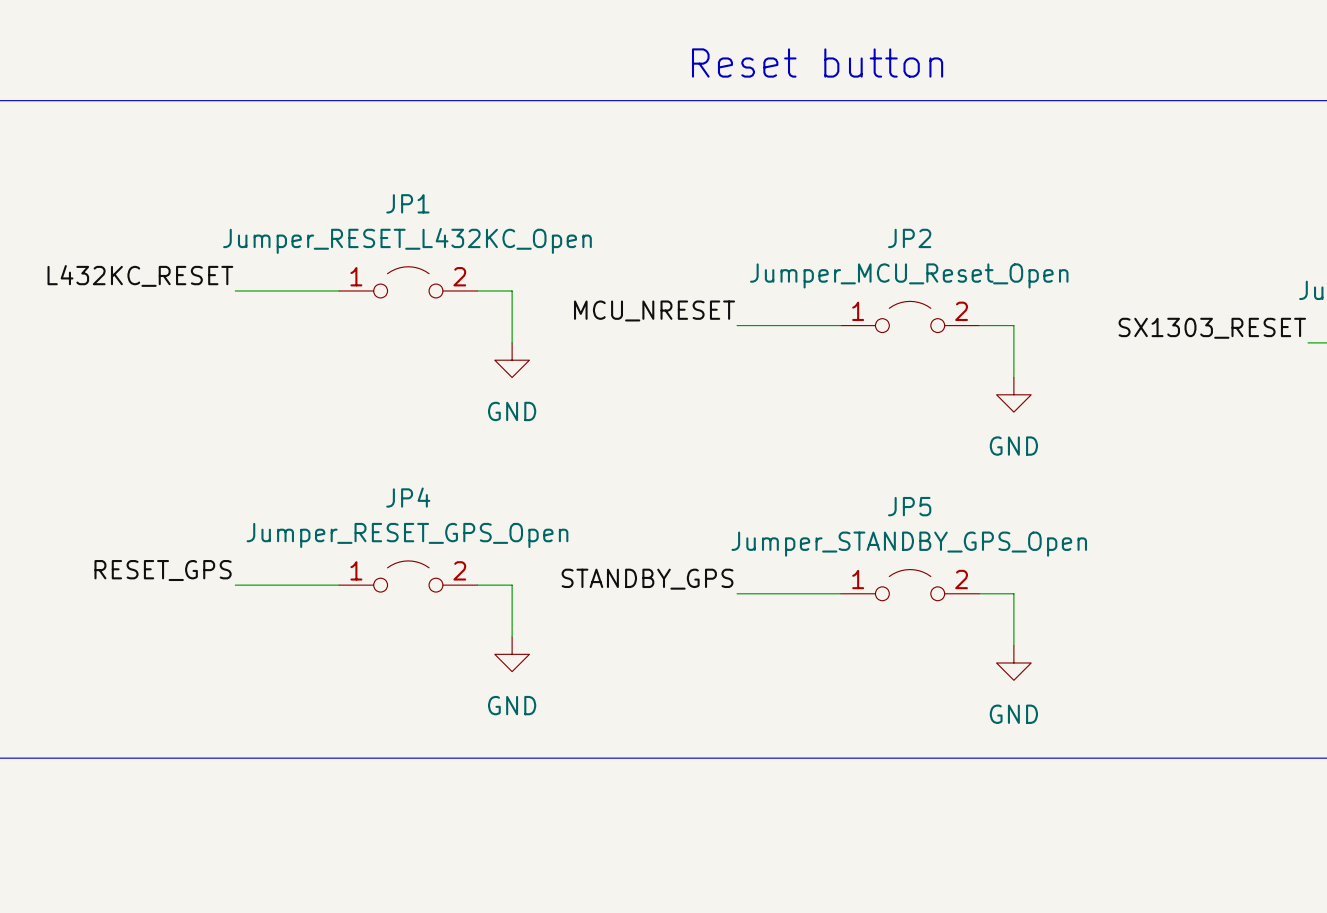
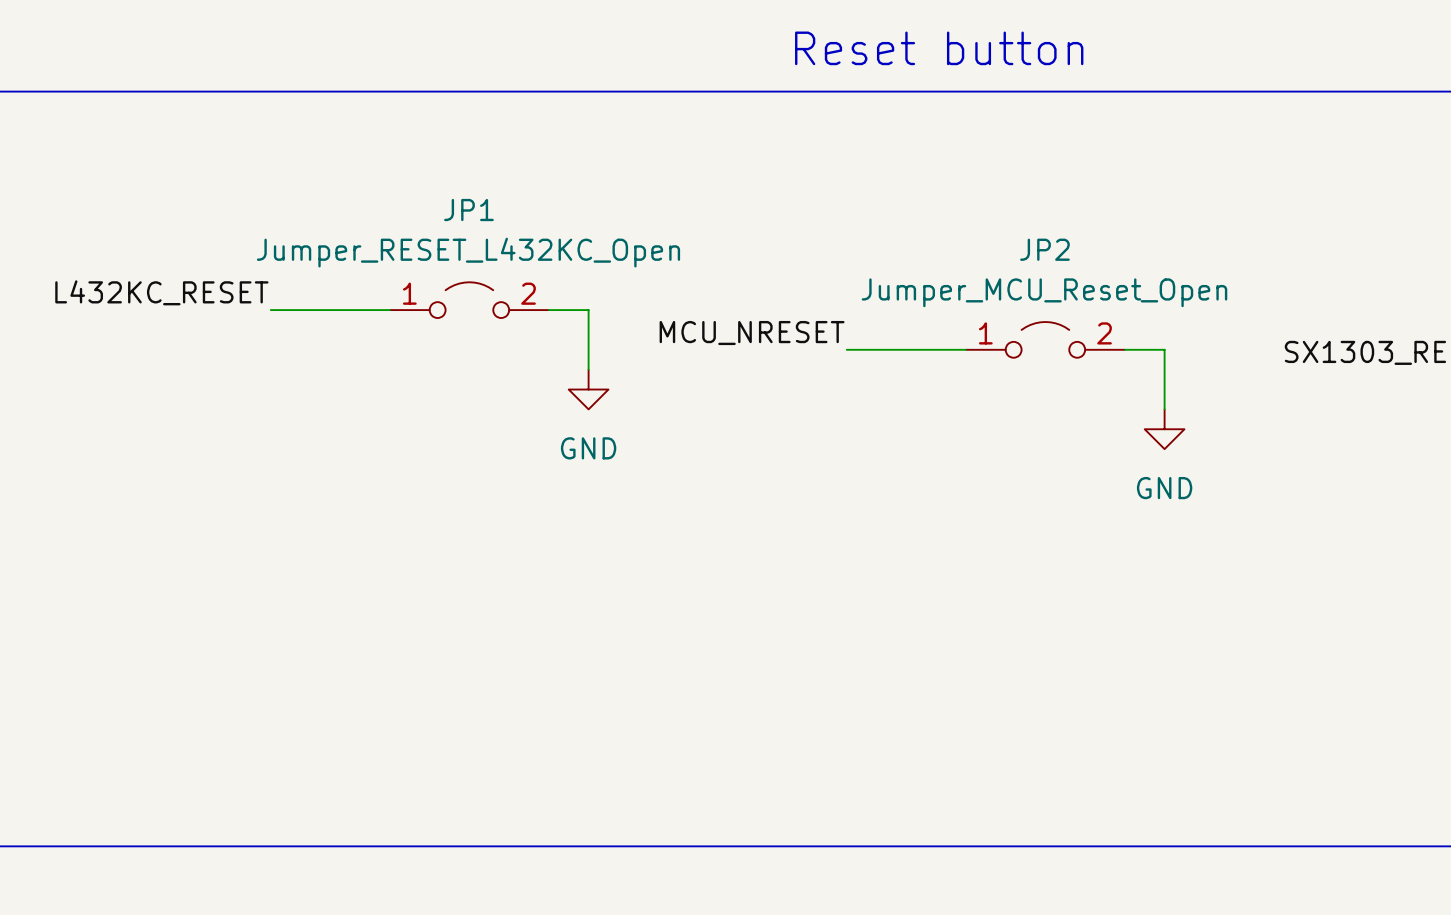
label: RESET_GPS (163, 570) -> none
JP4: Jumper_RESET_GPS_Open (408, 576) -> none
label: STANDBY_GPS (647, 579) -> none
wire: (235, 585) (339, 585) -> none
wire: (477, 585) (512, 585) (512, 637) -> none
JP5: Jumper_STANDBY_GPS_Open (910, 585) -> none
wire: (737, 593) (840, 593) -> none
wire: (979, 593) (1013, 593) (1013, 645) -> none
power symbol: GND (512, 654) -> none
power symbol: GND (1013, 662) -> none

